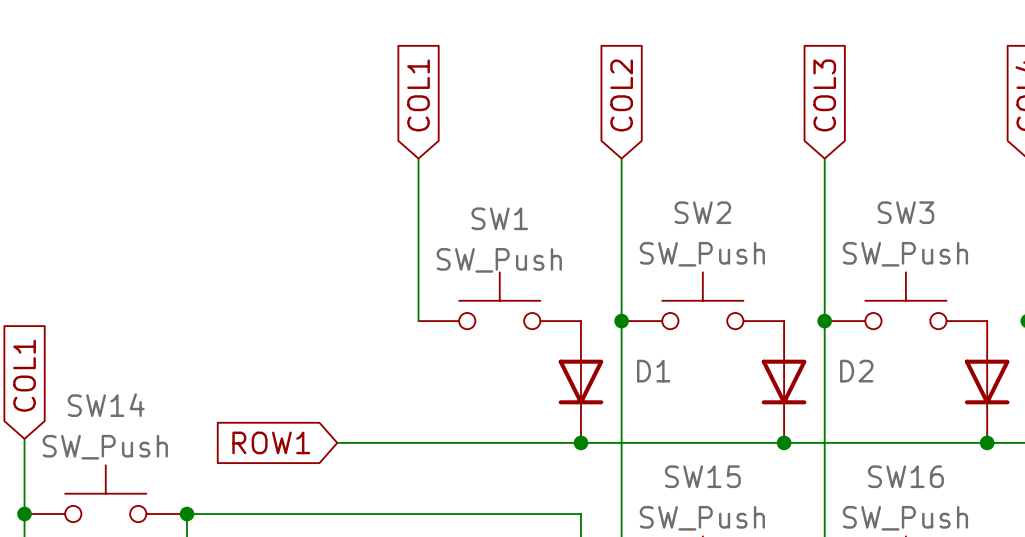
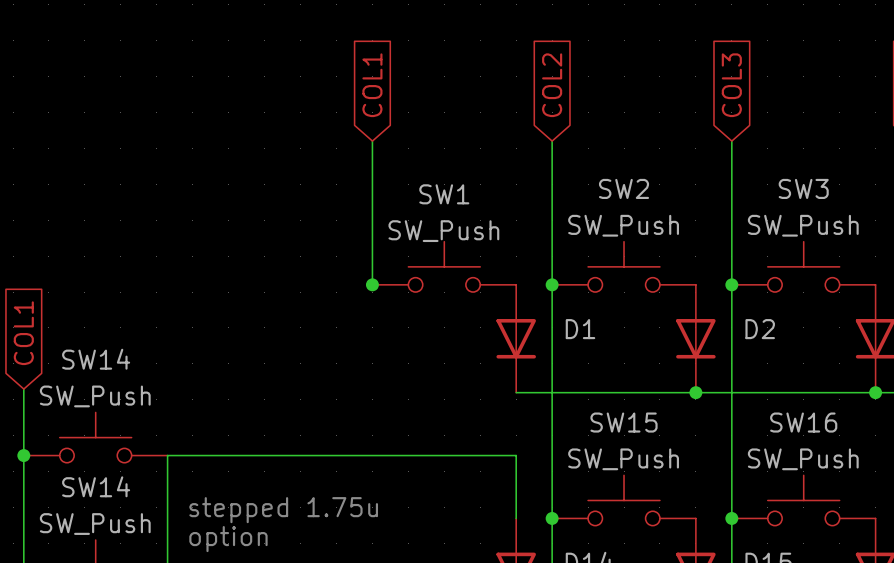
junction: none -> (372, 284)
global label: ROW1 (271, 442) -> none
wire: (337, 442) (580, 442) -> none
junction: (580, 442) -> none
junction: (187, 514) -> none

